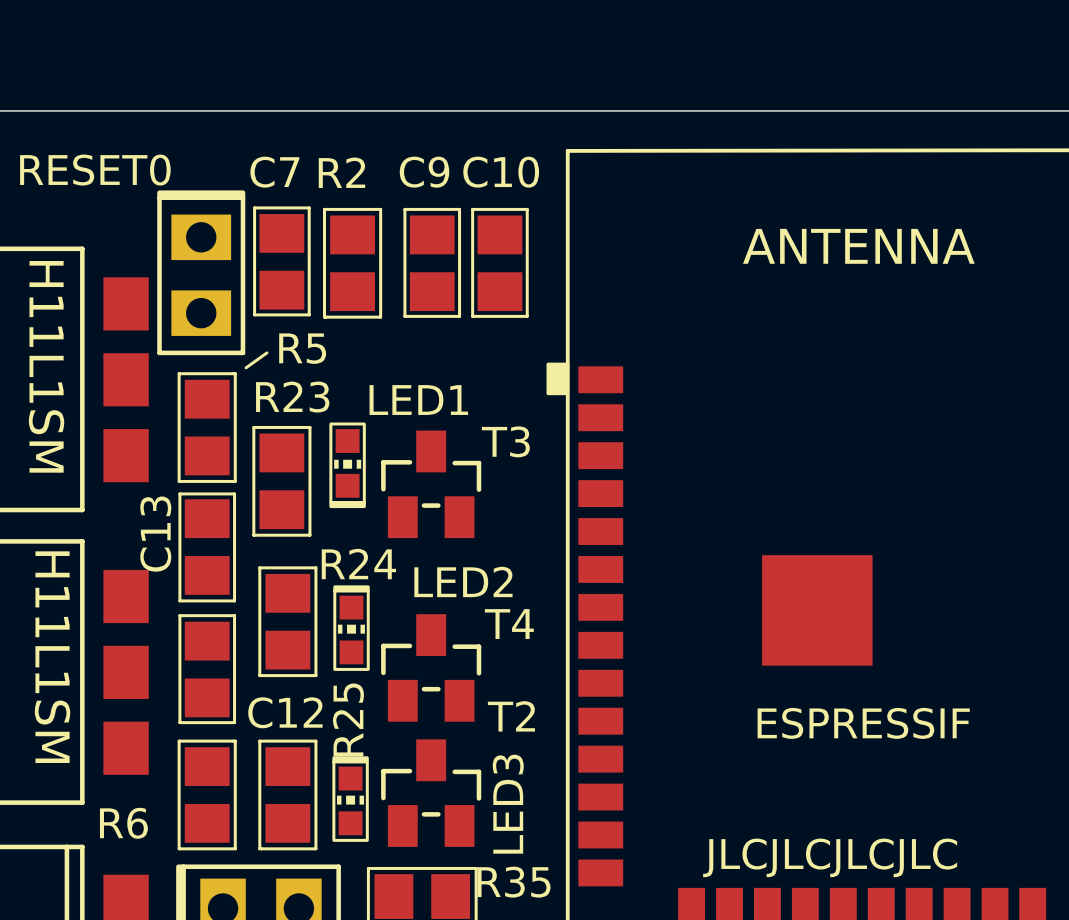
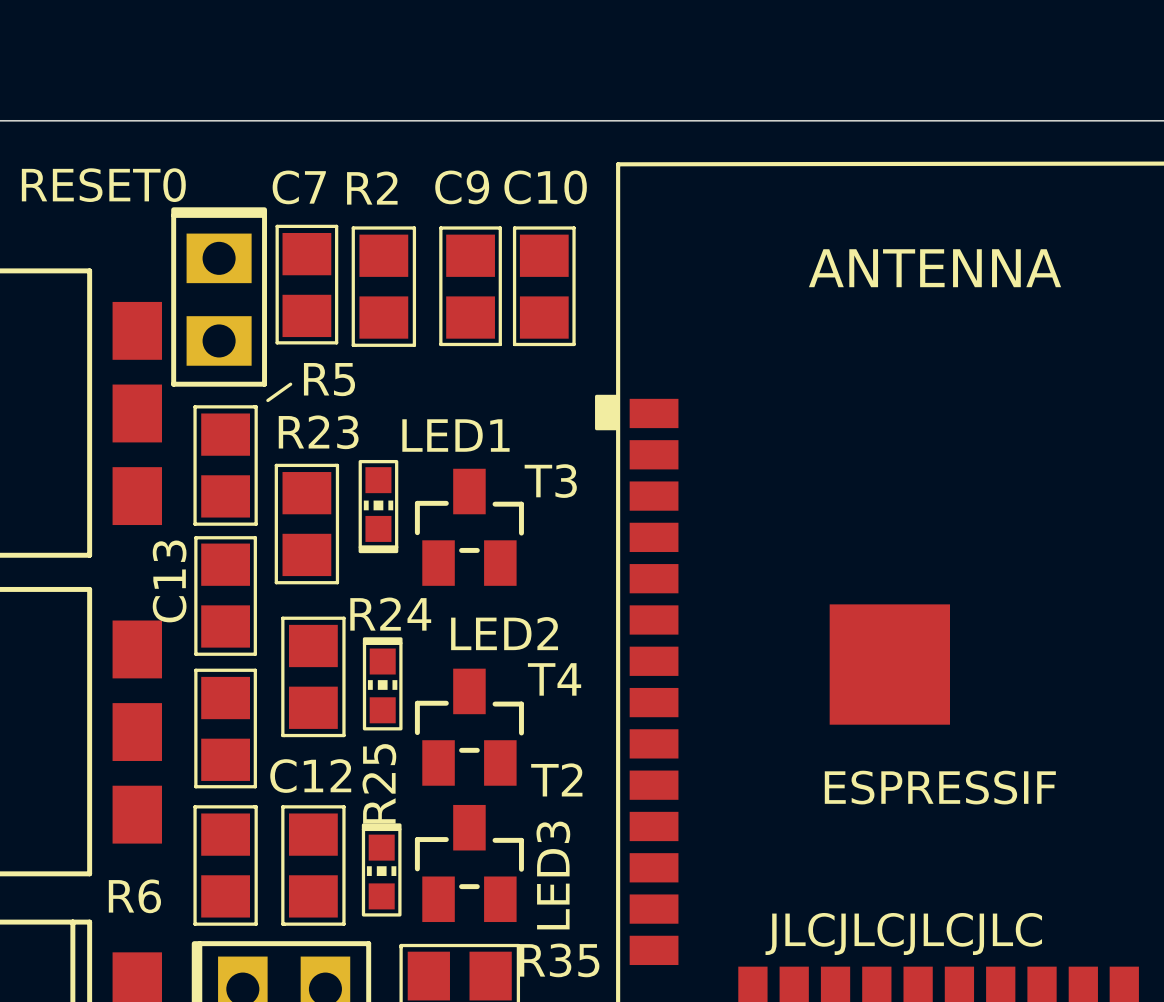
part value: H11L1SM (46, 366) -> none
part value: H11L1SM (52, 657) -> none

